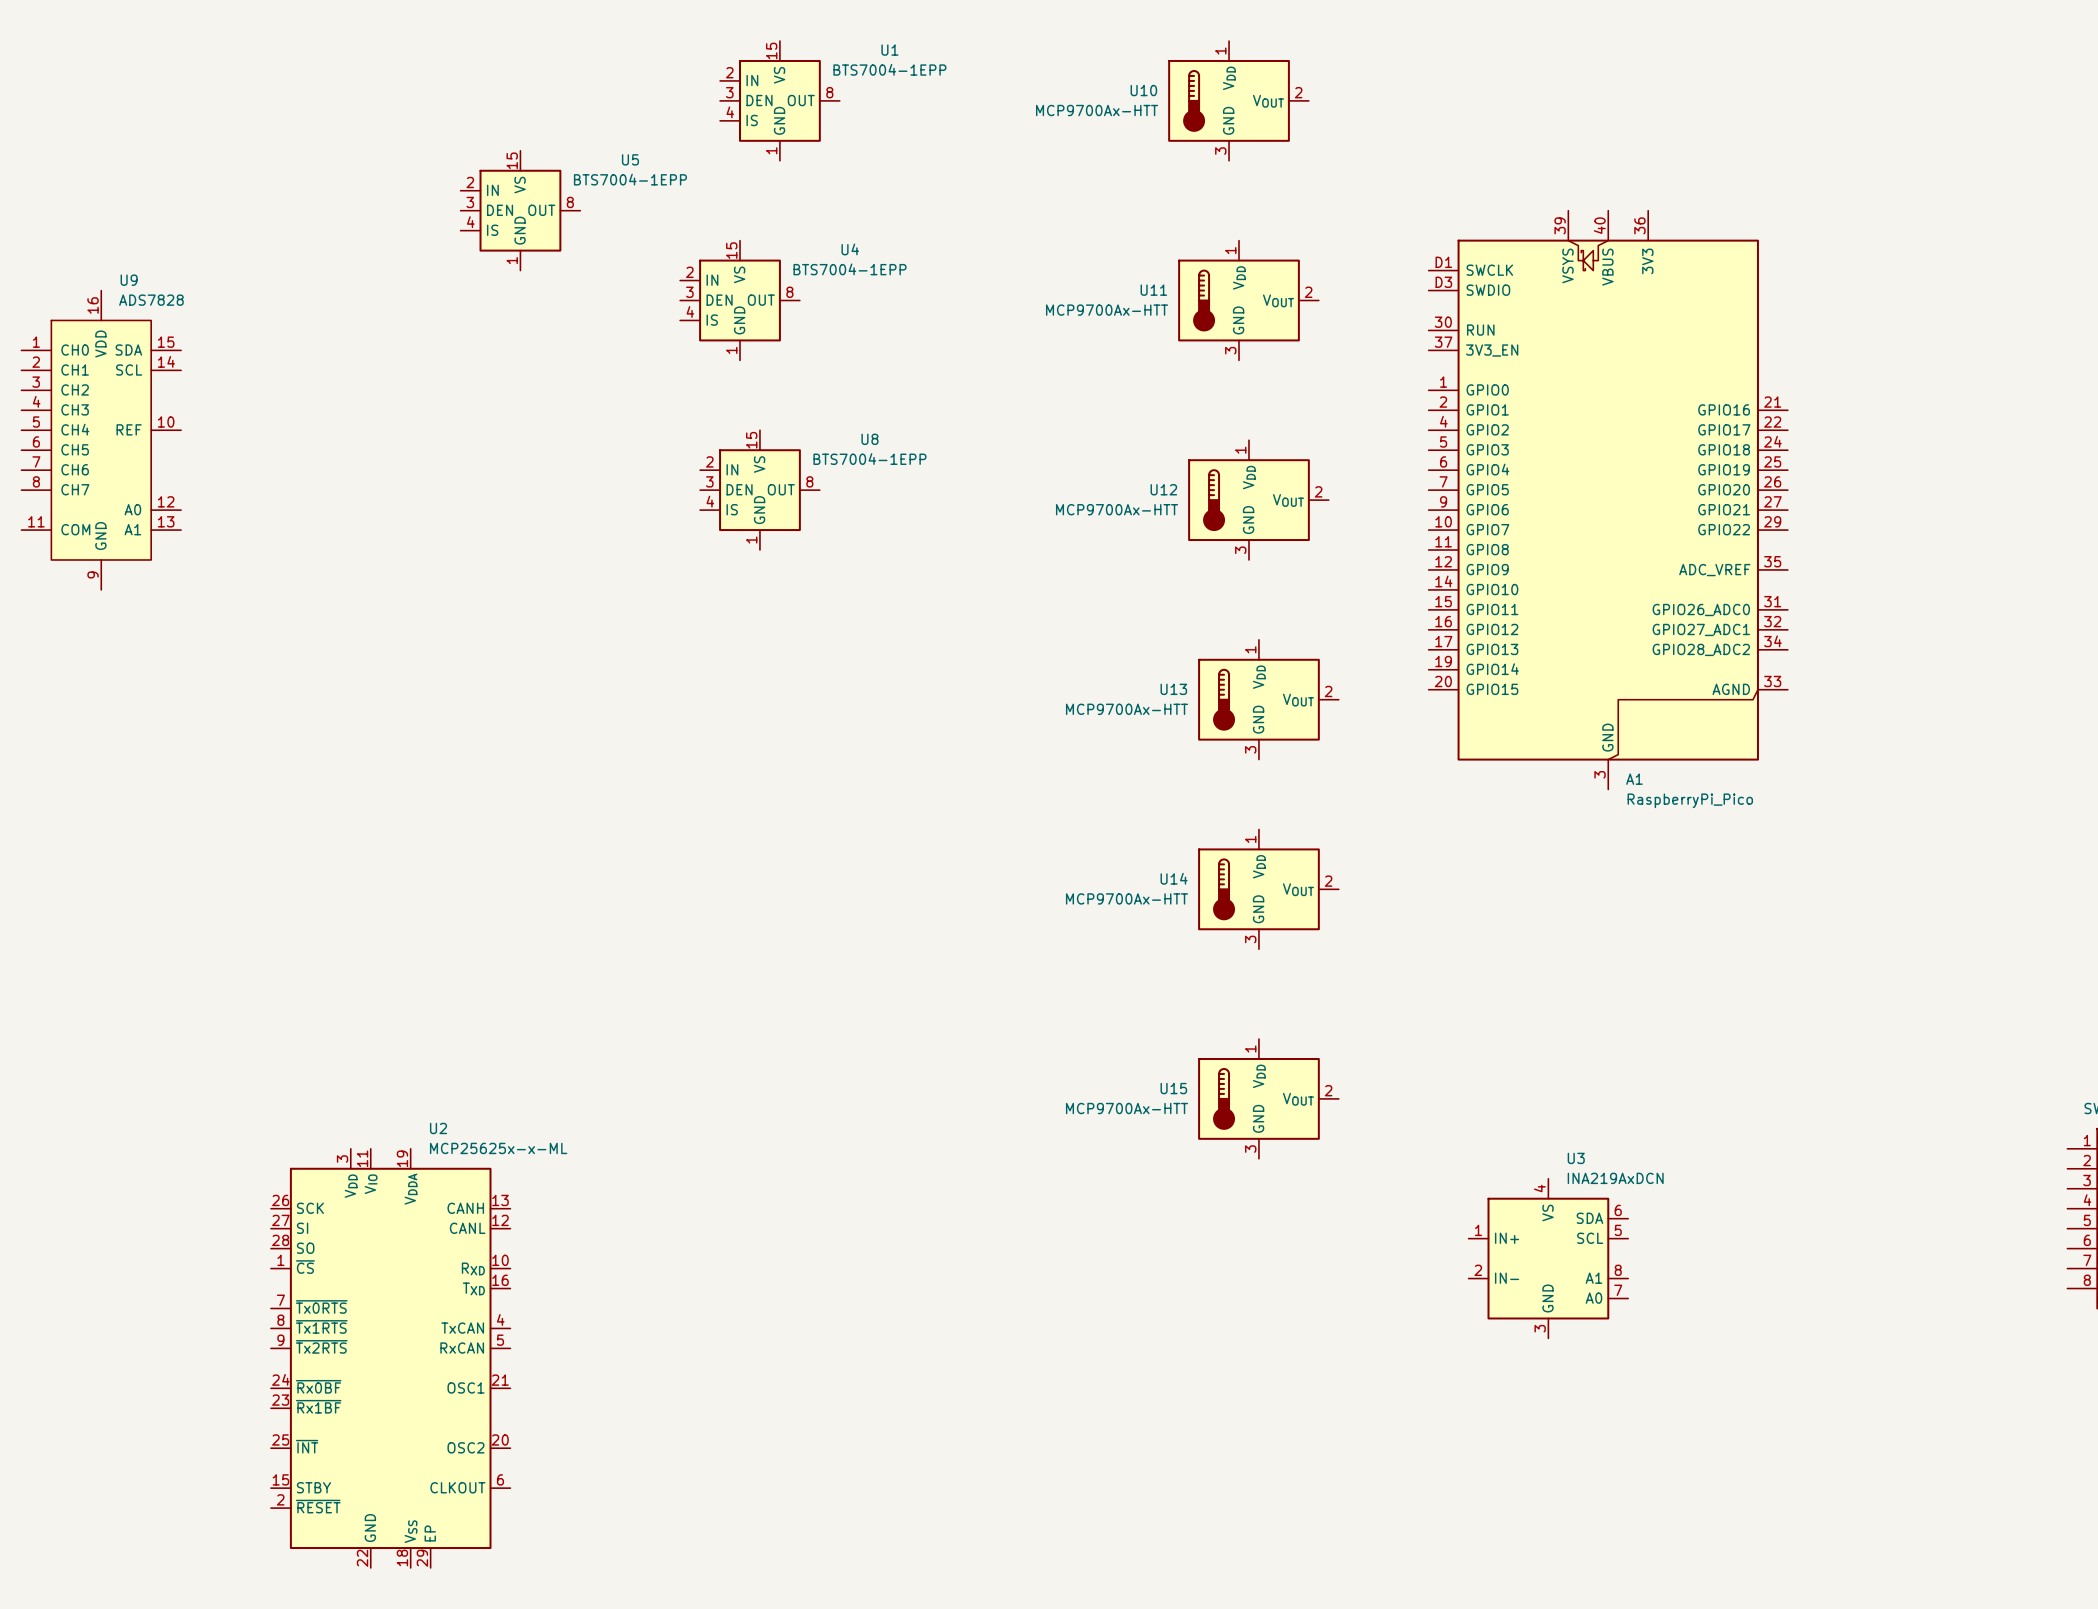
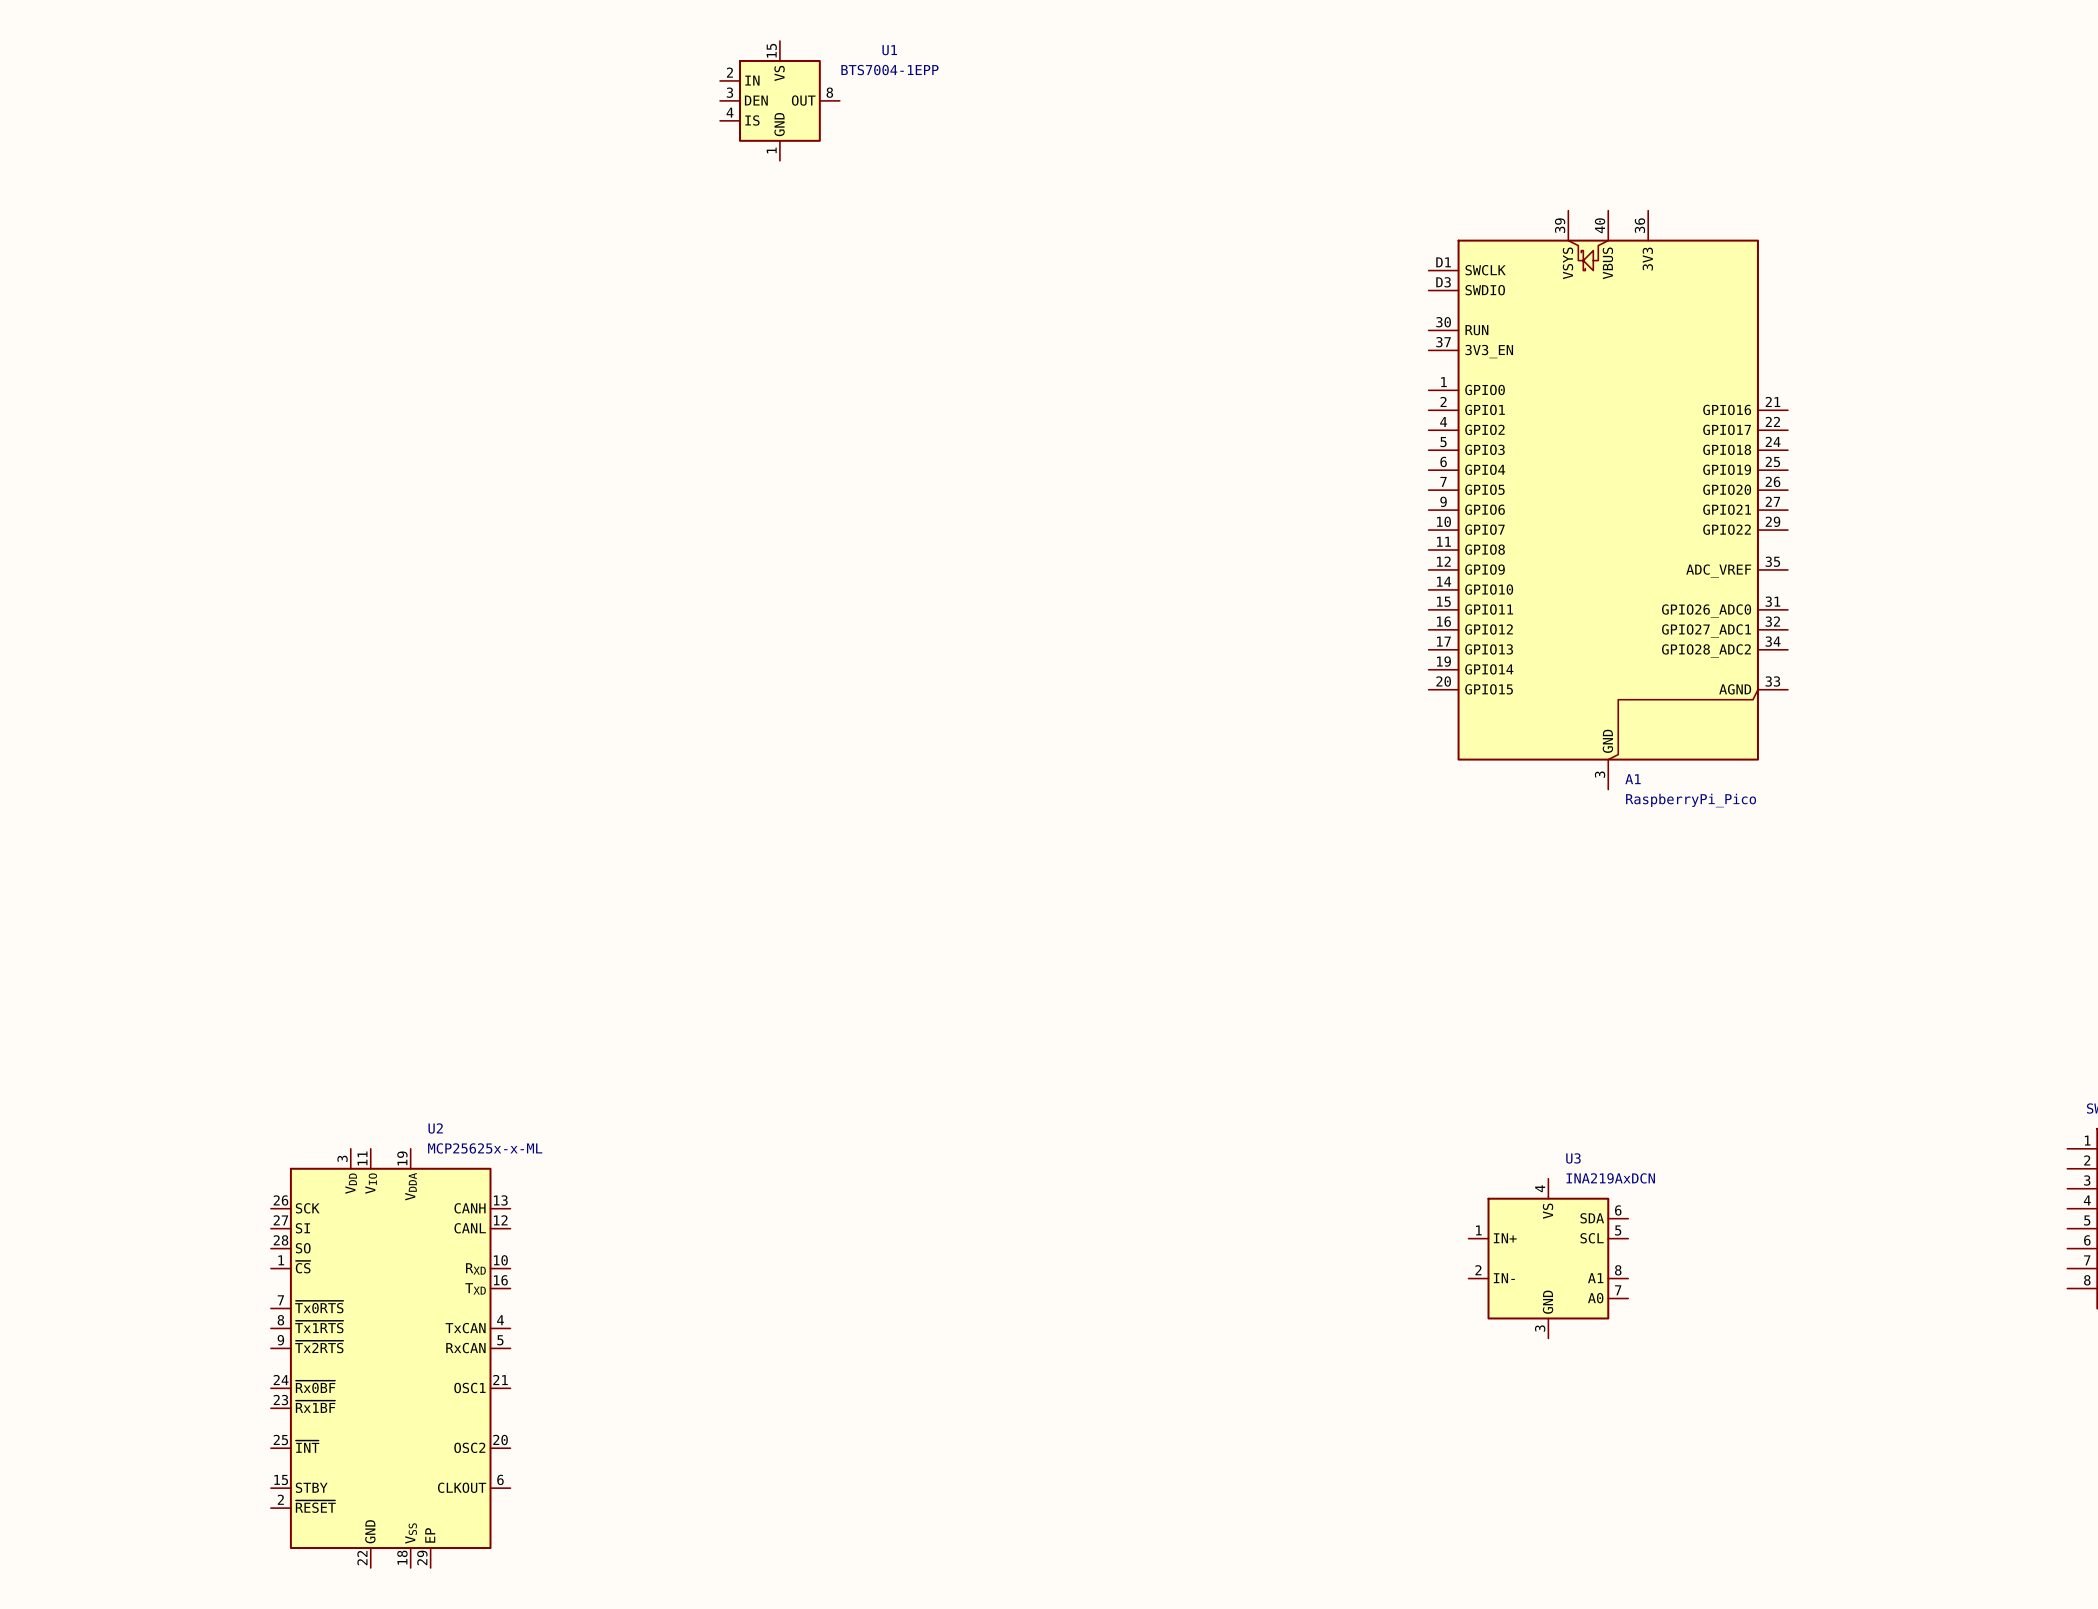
U10: MCP9700Ax-HTT (1238, 100) -> none
U5: BTS7004-1EPP (520, 210) -> none
U4: BTS7004-1EPP (740, 300) -> none
U11: MCP9700Ax-HTT (1248, 300) -> none
U9: ADS7828 (101, 440) -> none
U8: BTS7004-1EPP (759, 490) -> none
U12: MCP9700Ax-HTT (1258, 500) -> none
U13: MCP9700Ax-HTT (1268, 699) -> none
U14: MCP9700Ax-HTT (1268, 889) -> none
U15: MCP9700Ax-HTT (1268, 1098) -> none

